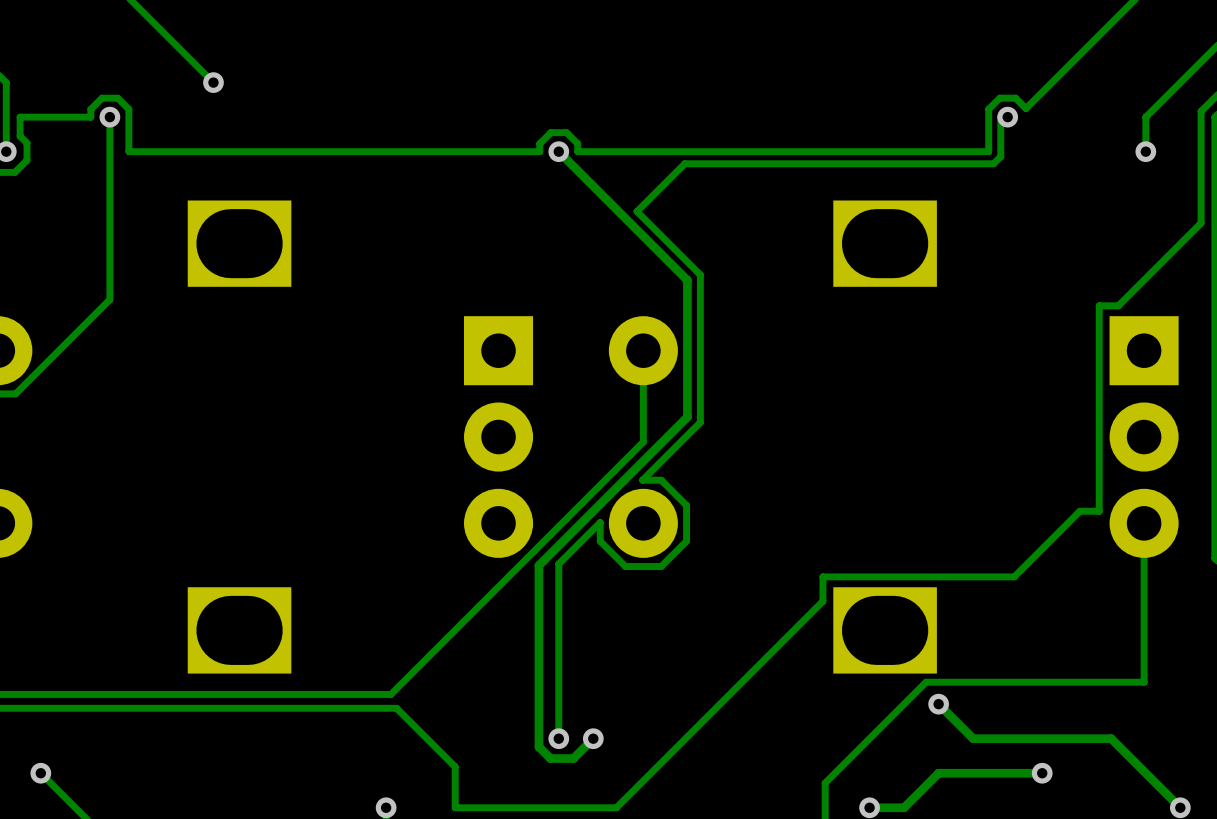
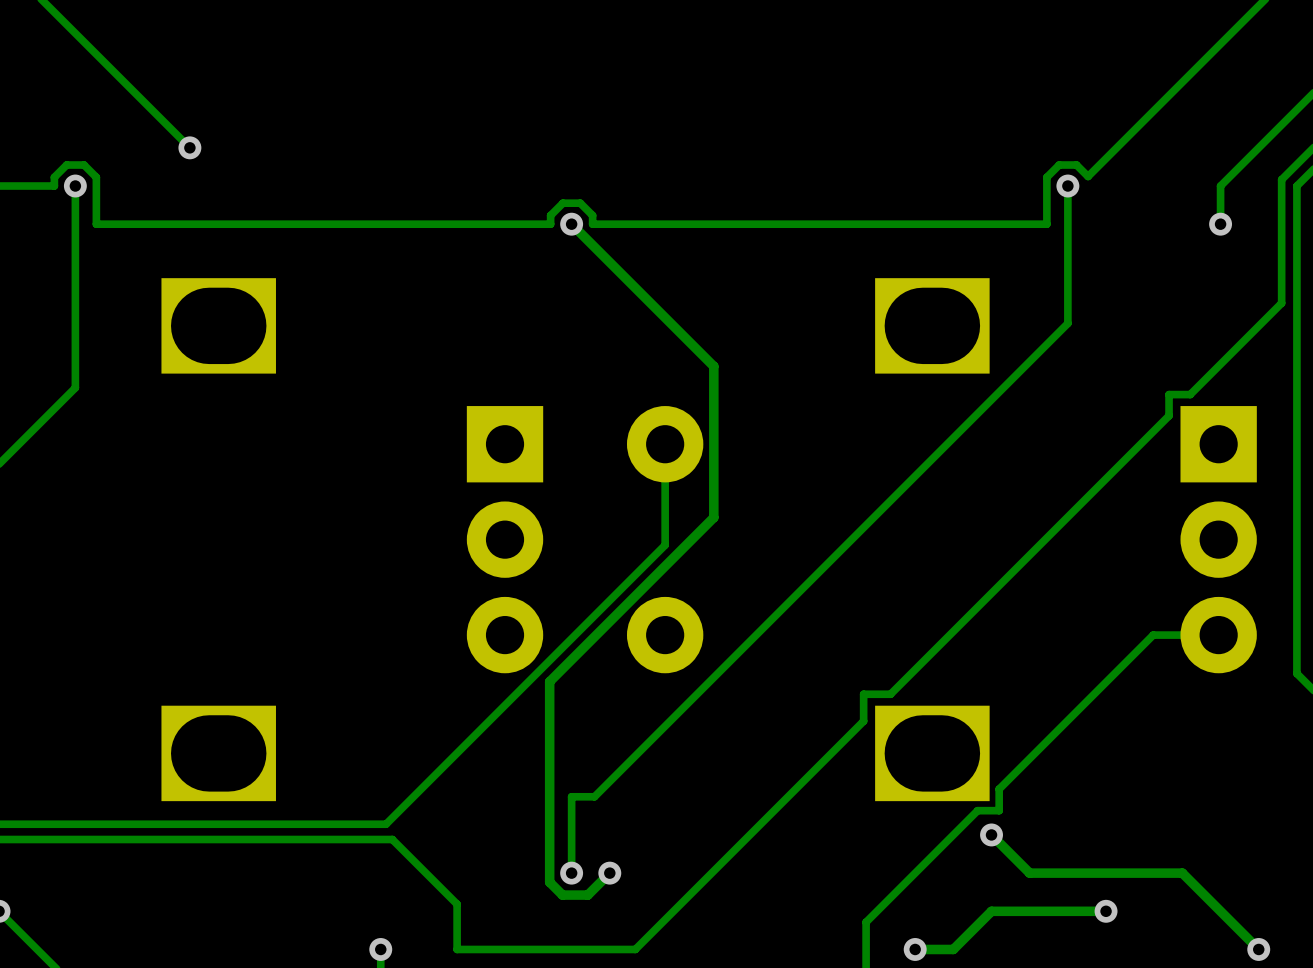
track: (1007, 117) (1000, 117) (1000, 156) (993, 163) (684, 163) (637, 211) (700, 274) (700, 422) (642, 480) (661, 480) (686, 505) (686, 541) (661, 566) (625, 566) (600, 541) (600, 522) (558, 564) (558, 669) -> (1067, 186) (1067, 323) (594, 796) (571, 796)
track: (1099, 325) (1099, 511) (1079, 511) (1014, 576) (847, 576) -> (1169, 415) (890, 694)
track: (1144, 523) (1144, 682) (945, 682) -> (1218, 635) (1153, 635) (999, 789) (999, 810)

